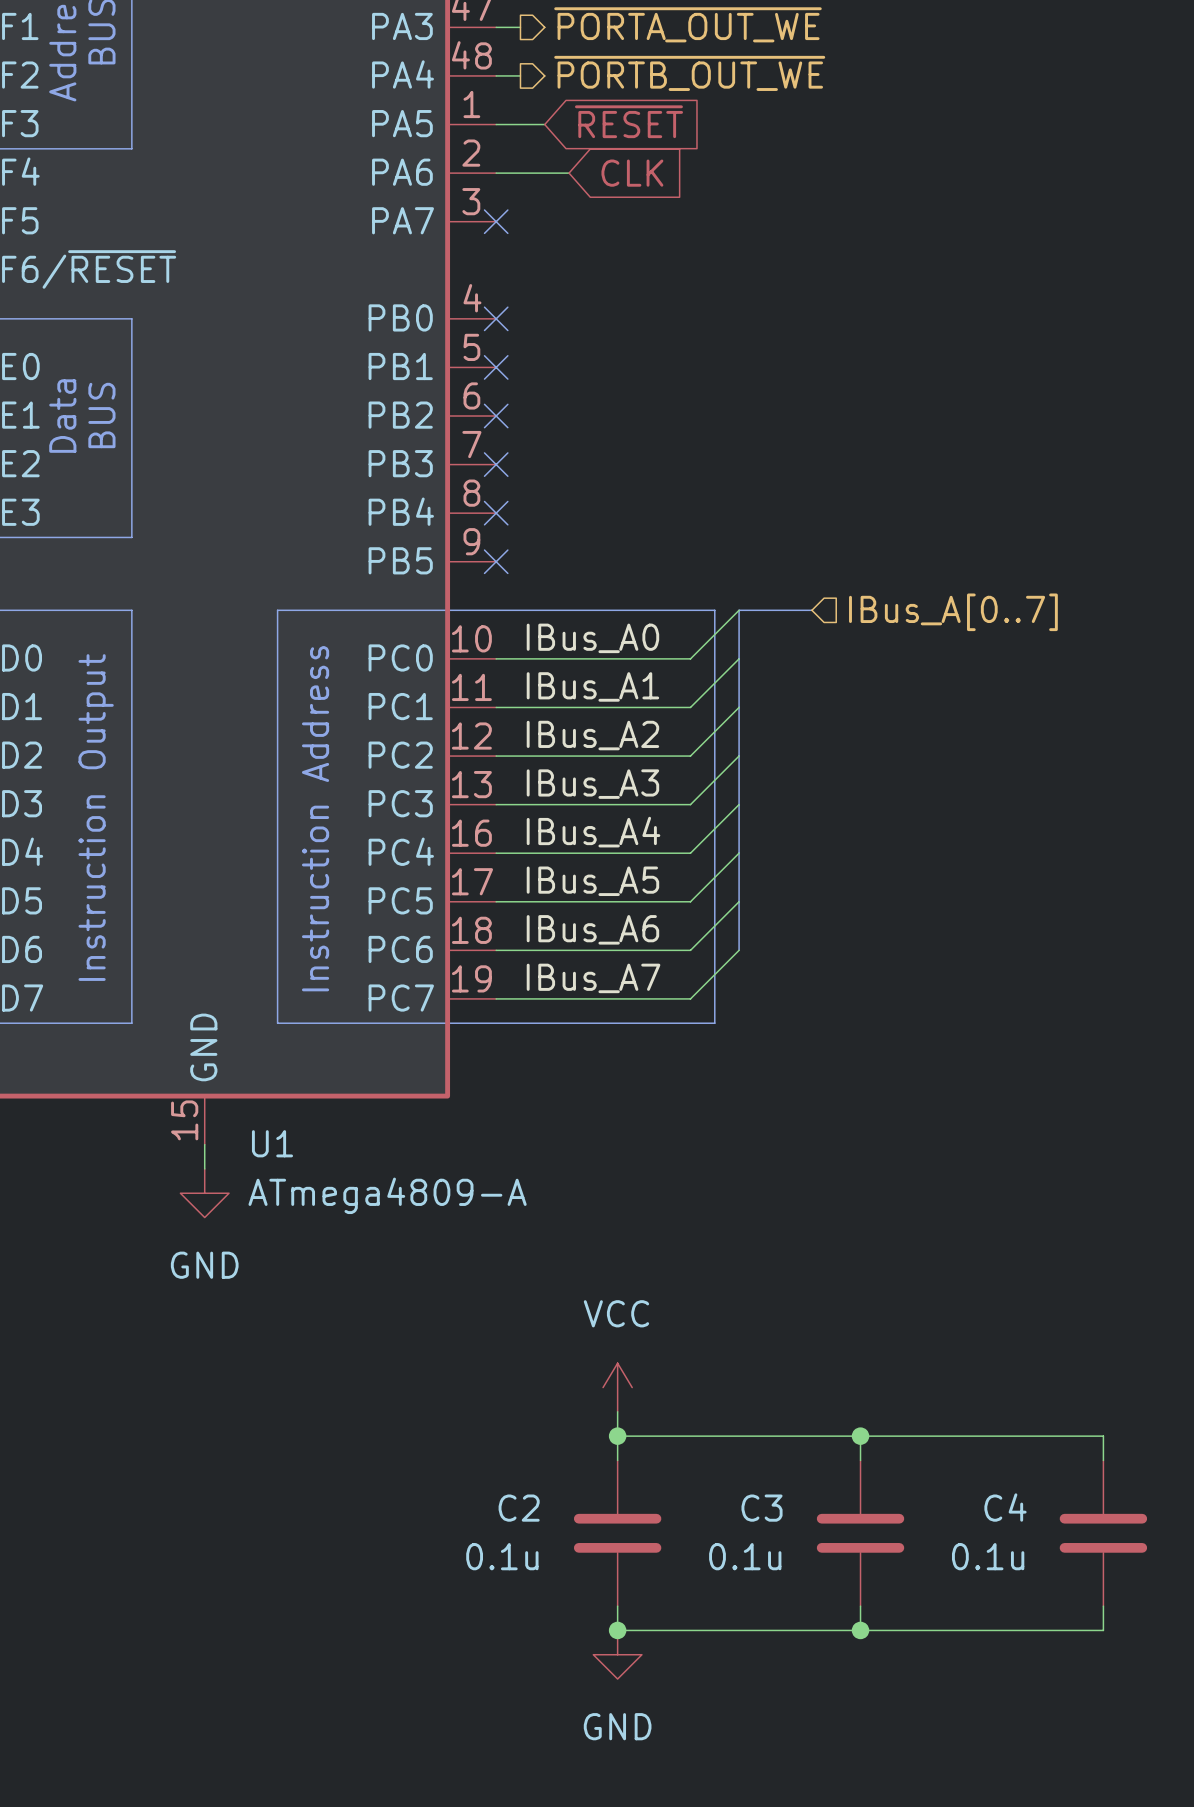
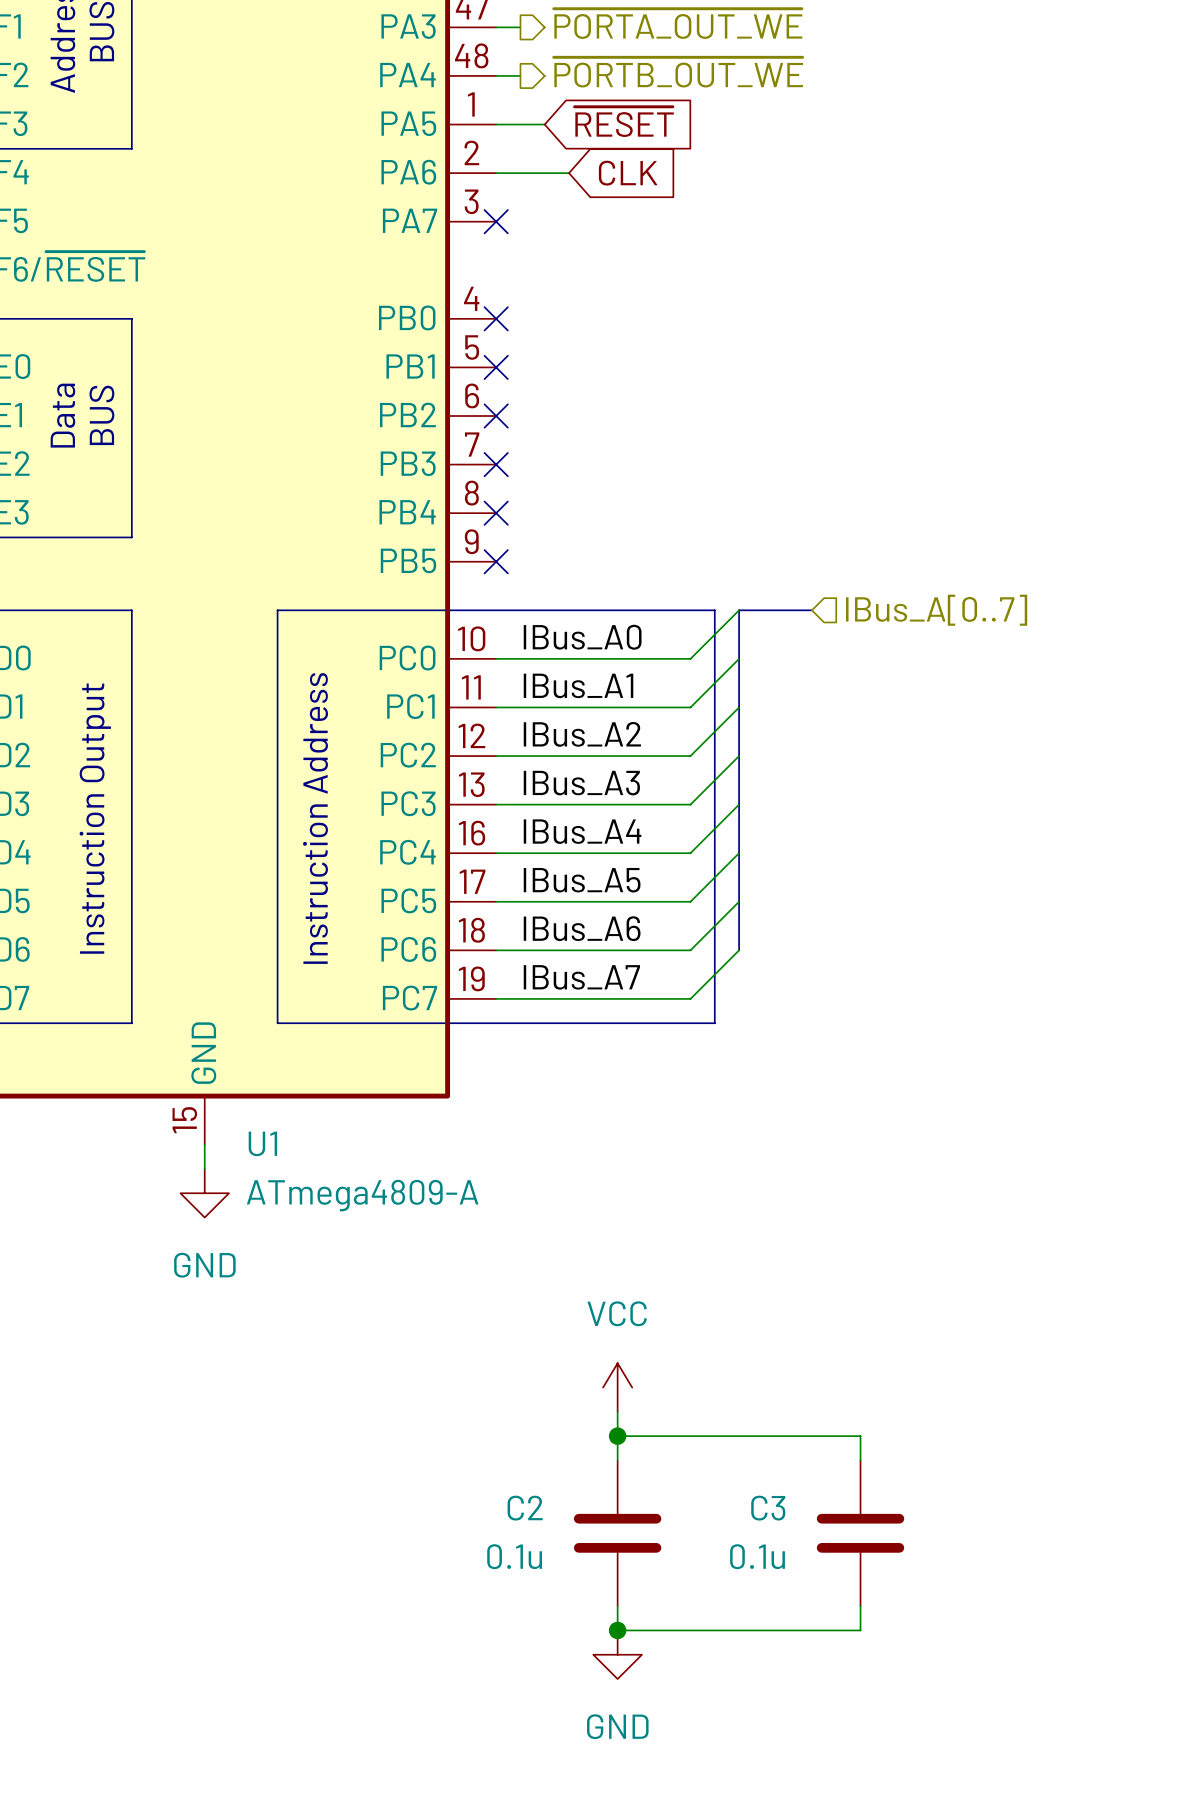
wire: (860, 1436) (1103, 1436) (1103, 1460) -> none
junction: (860, 1436) -> none
C4: 0.1u (1103, 1533) -> none
wire: (1103, 1606) (1103, 1630) (860, 1630) -> none
junction: (860, 1630) -> none

